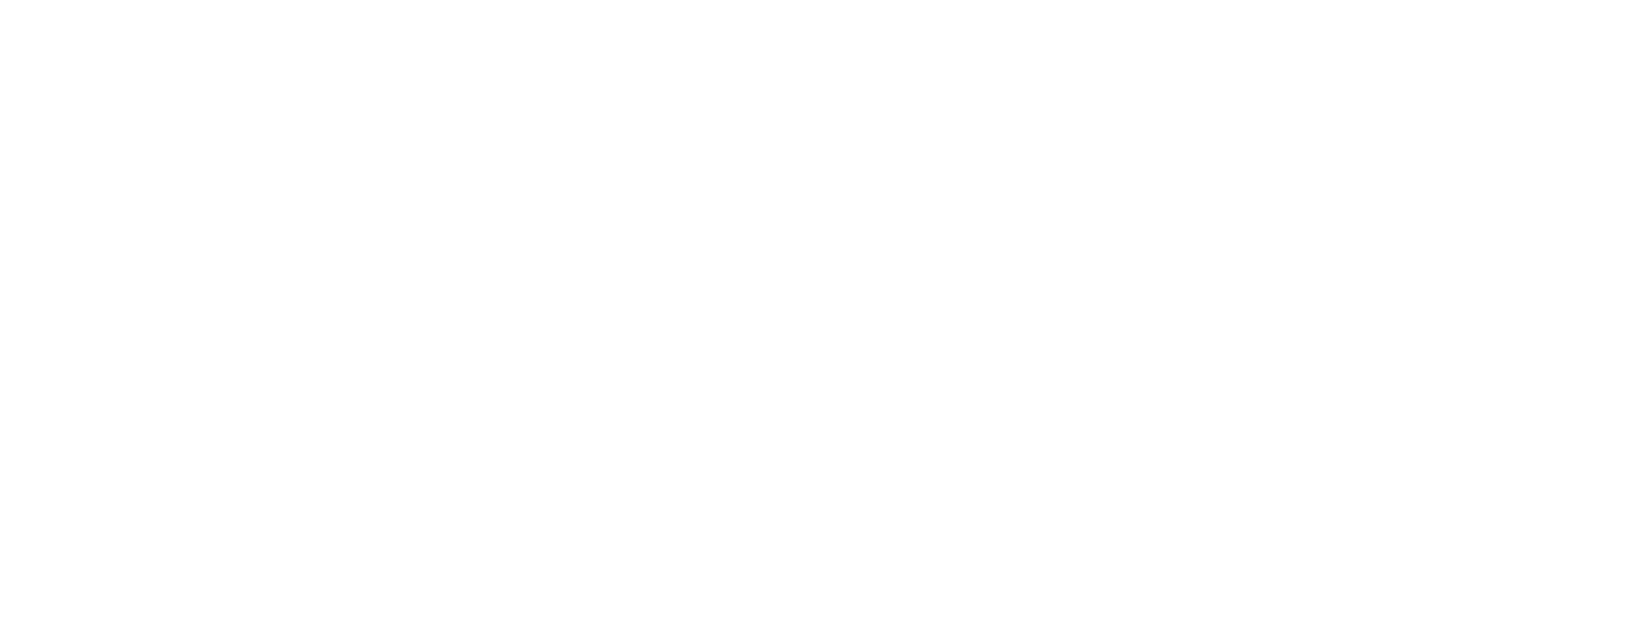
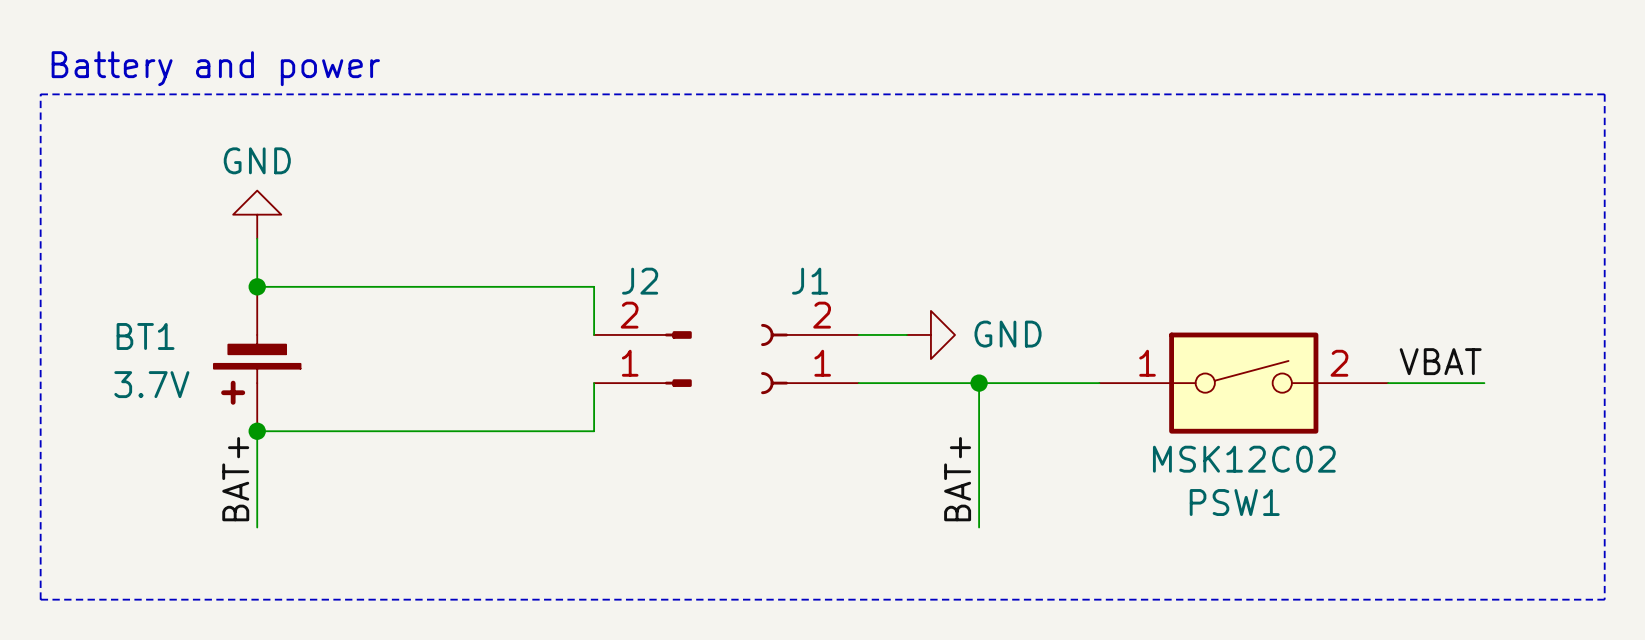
text: none -> Battery and power (215, 68)
line: none -> (40, 94) (1604, 94) (1604, 599) (40, 599) (40, 94)
power symbol: none -> GND (257, 214)
wire: none -> (257, 238) (257, 286) (594, 286) (594, 334)
junction: none -> (257, 286)
wire: none -> (858, 334) (906, 334)
power symbol: none -> GND (930, 334)
BT1: none -> 3.7V (257, 359)
J2: none -> (642, 359)
J1: none -> (809, 359)
label: none -> VBAT (1440, 361)
wire: none -> (594, 383) (594, 431) (257, 431) (257, 527)
wire: none -> (858, 383) (1099, 383)
wire: none -> (979, 383) (979, 527)
junction: none -> (979, 383)
PSW1: none -> MSK12C02 (1243, 383)
wire: none -> (1388, 383) (1484, 383)
junction: none -> (257, 431)
label: none -> BAT+ (235, 479)
label: none -> BAT+ (957, 479)

